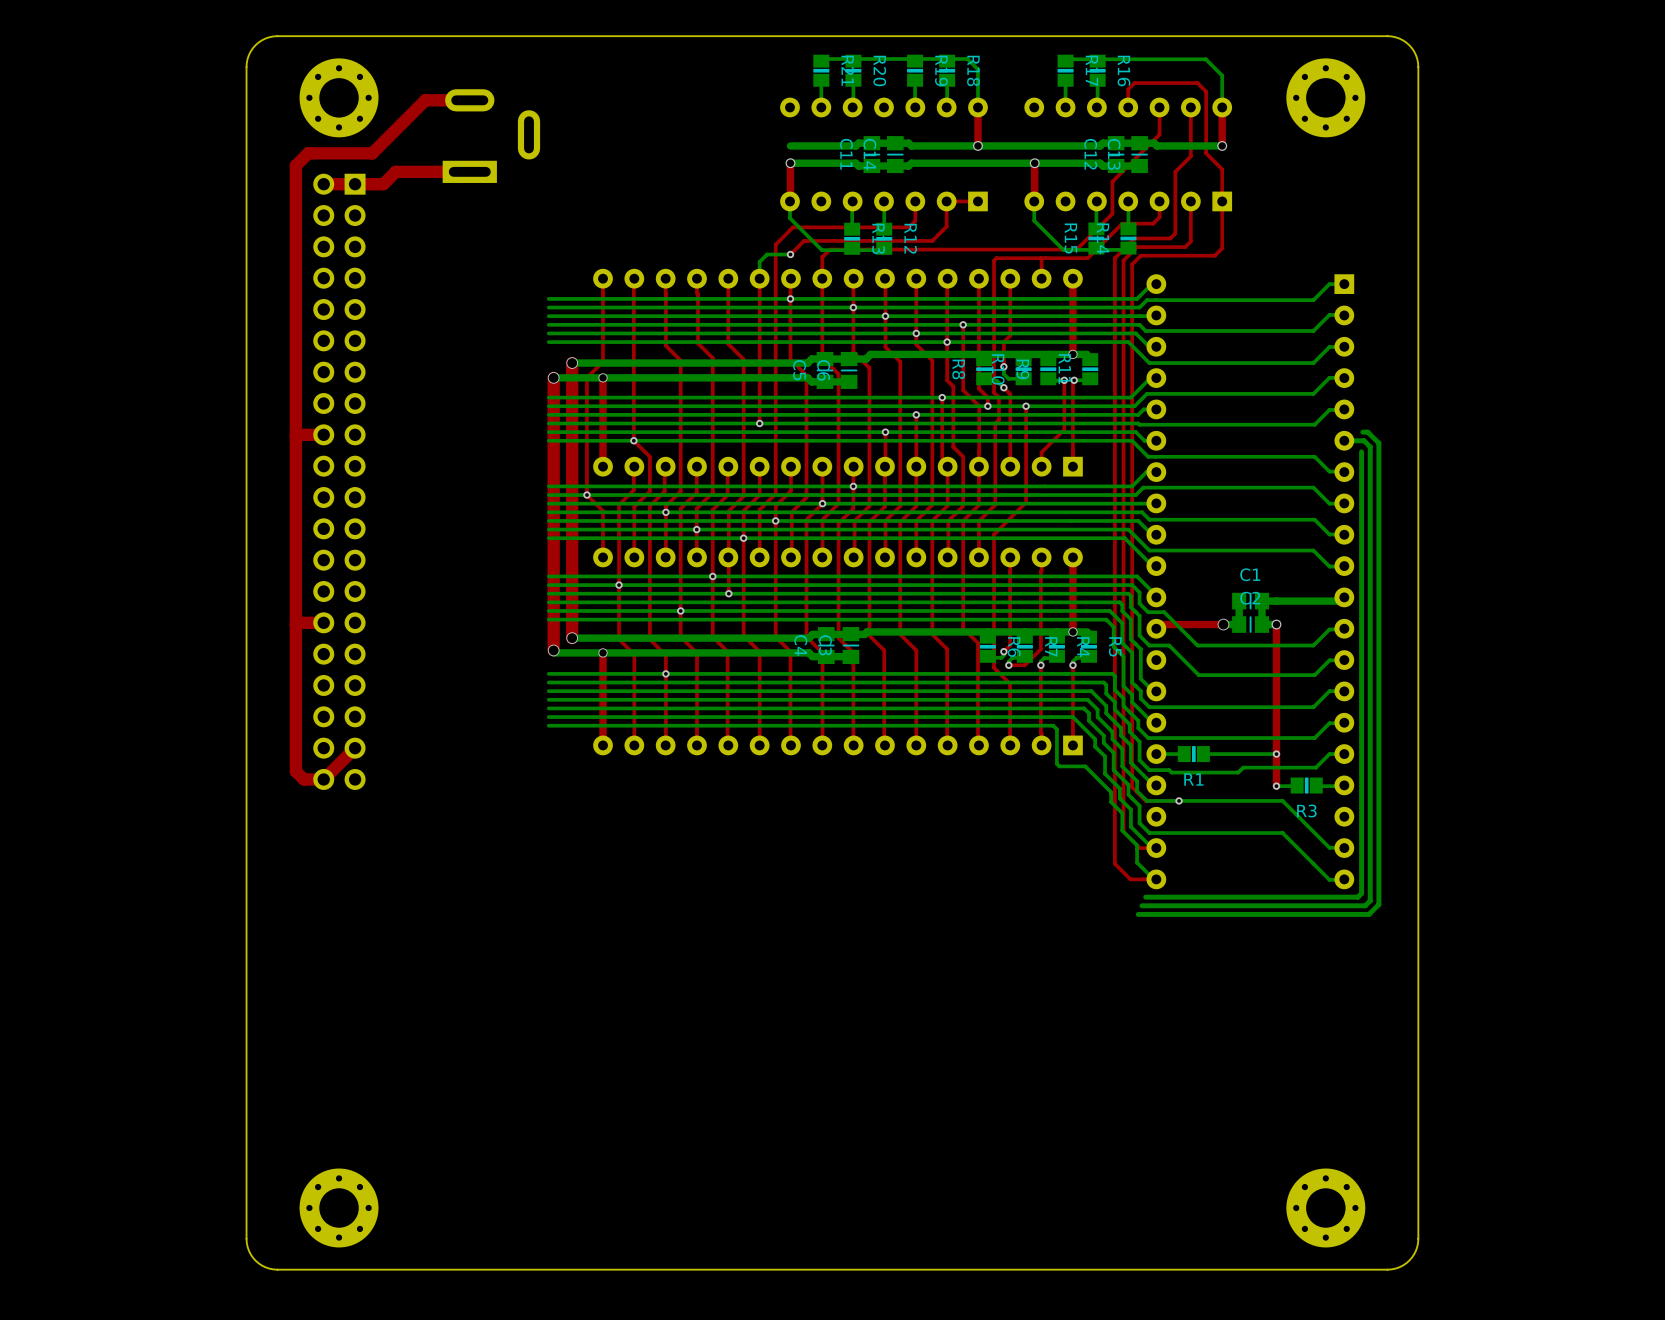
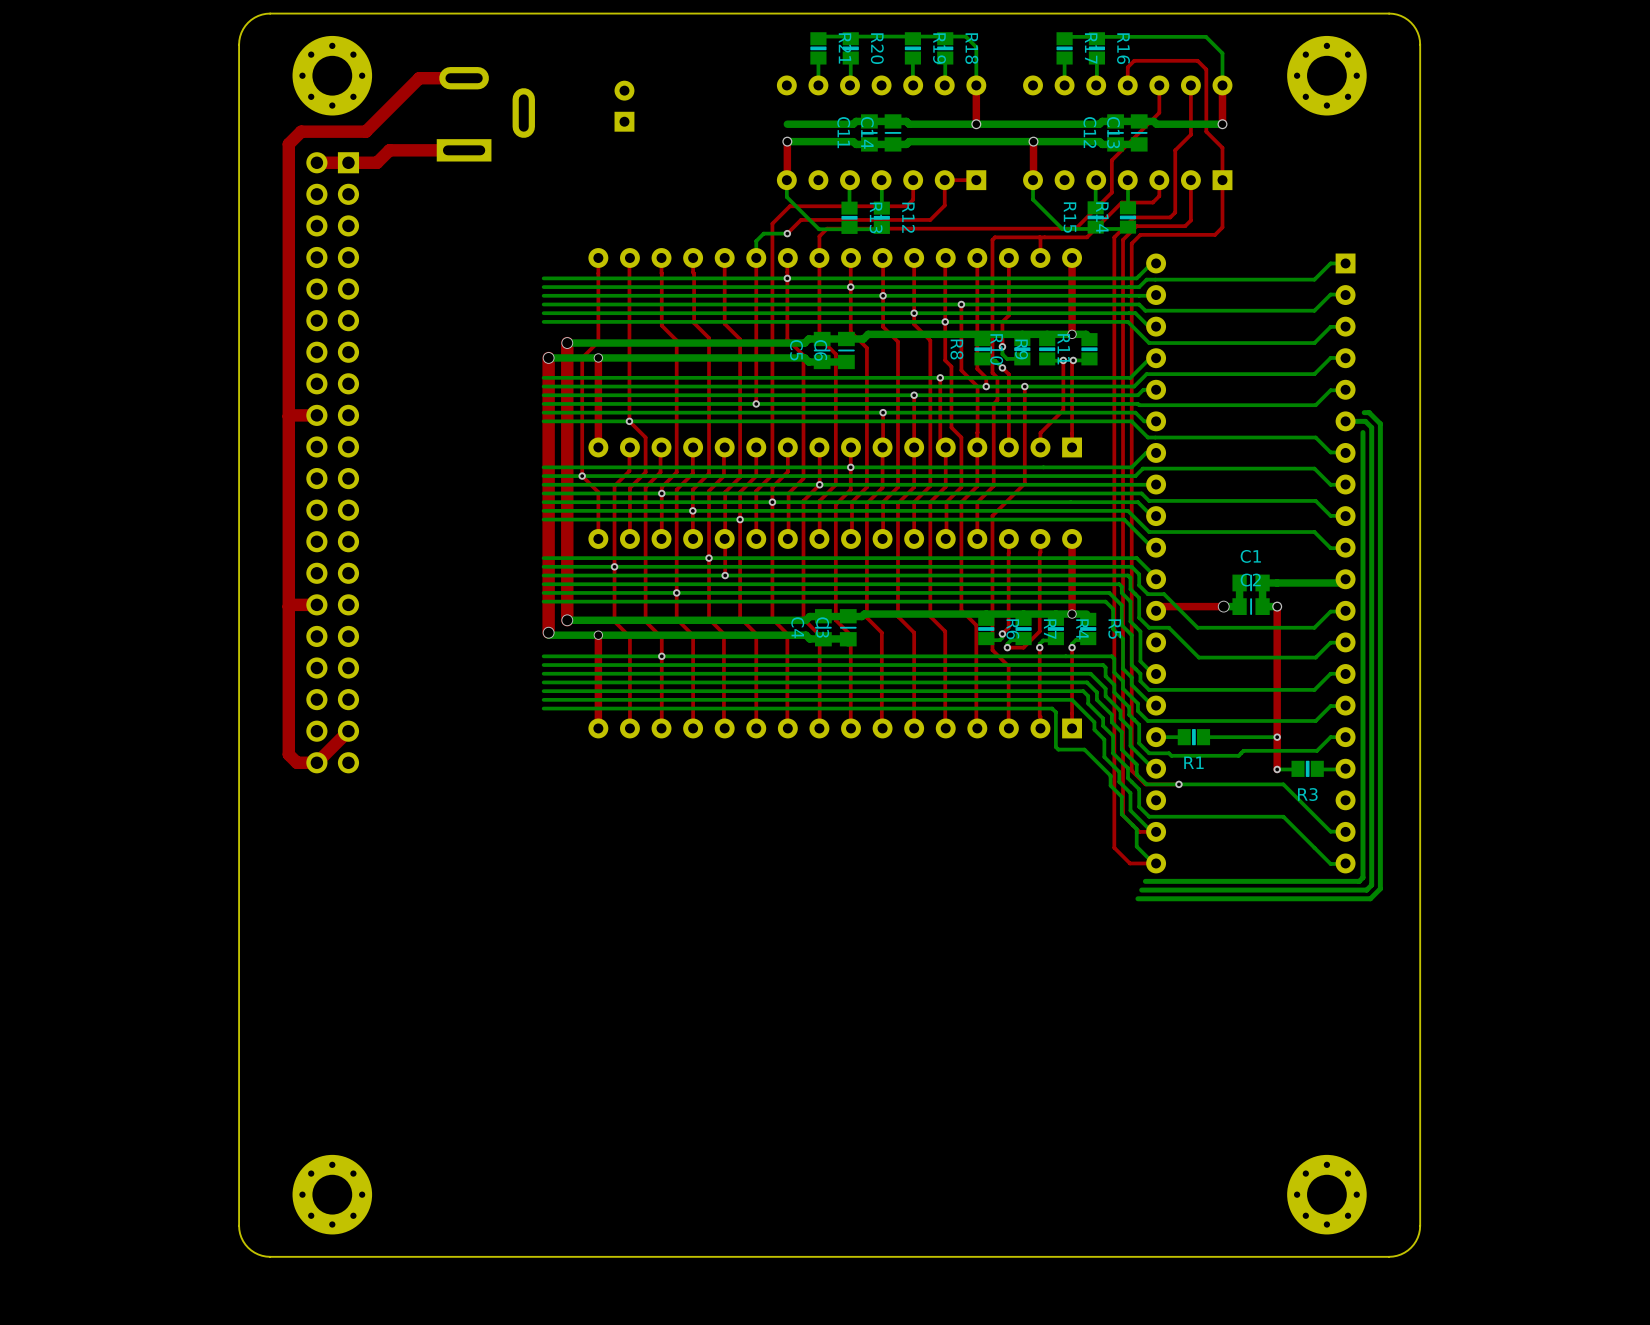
part: none -> (624, 106)

